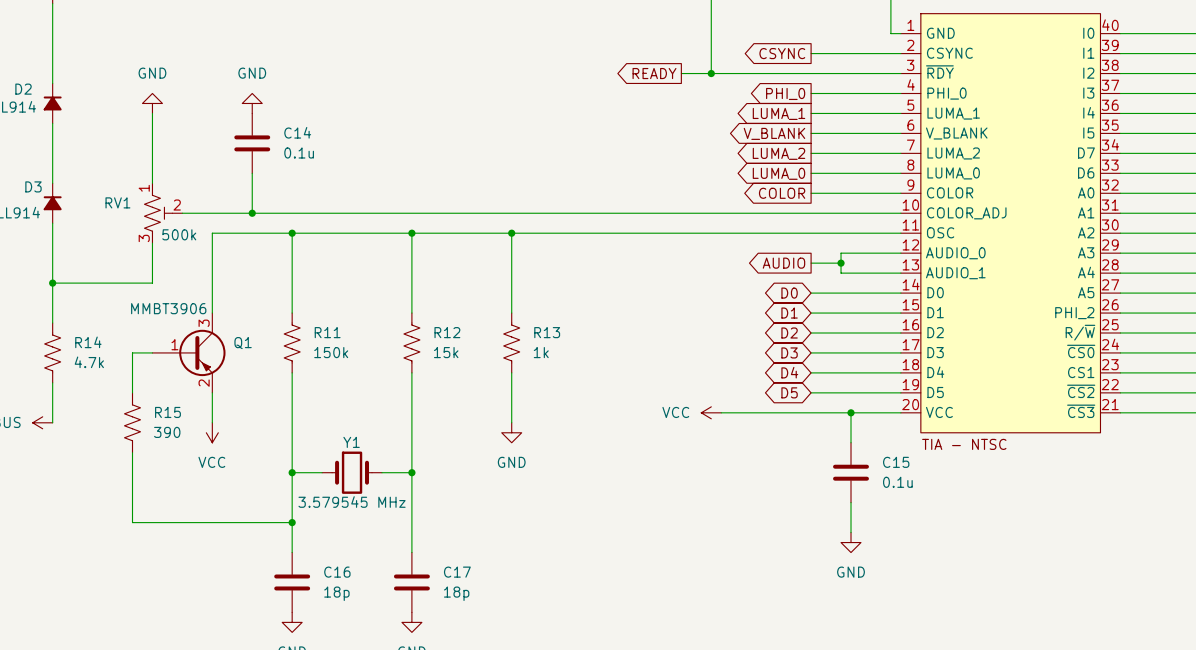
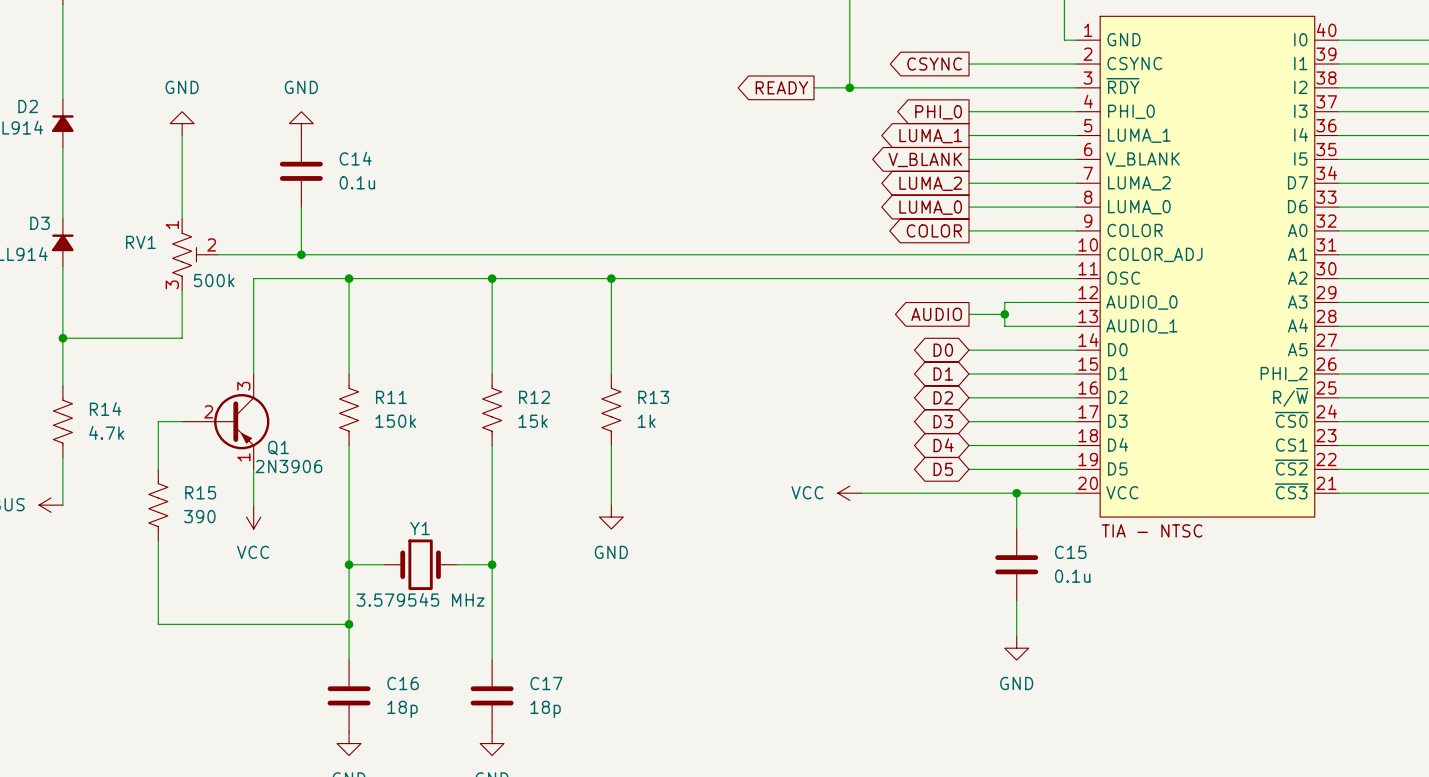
Q1 value: MMBT3906 (168, 308) -> 2N3906 (288, 466)
Q1 name position: Q1 (243, 343) -> Q1 (278, 448)
Q1 pin number: 1 (174, 344) -> 2 (208, 411)
Q1 pin number: 2 (204, 383) -> 1 (243, 457)

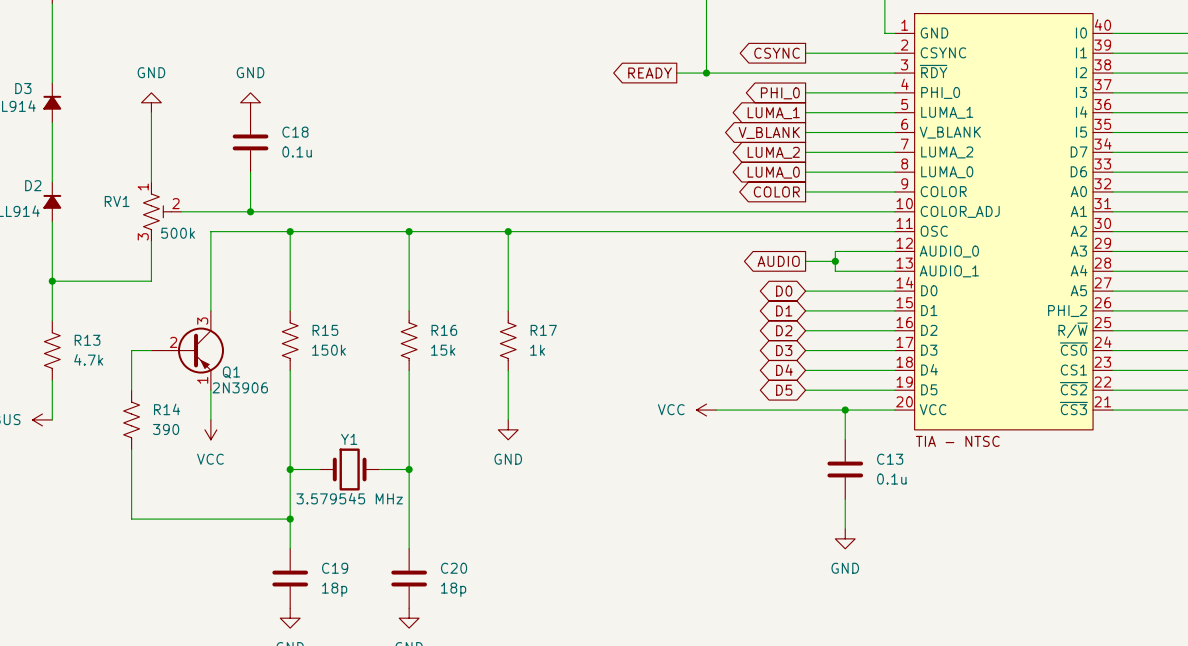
D2 name: D2 (28, 106) -> D3 (23, 88)
C14 name: C14 (355, 158) -> C18 (295, 132)
D3 name: D3 (40, 223) -> D2 (33, 185)
R11 name: R11 (391, 397) -> R15 (325, 330)
R12 name: R12 (534, 397) -> R16 (444, 330)
R13 name: R13 (653, 397) -> R17 (543, 330)
R14 name: R14 (105, 409) -> R13 (87, 340)
R15 name: R15 (200, 492) -> R14 (167, 409)
C15 name: C15 (1070, 552) -> C13 (890, 459)
C16 name: C16 (403, 683) -> C19 (335, 568)
C17 name: C17 (546, 683) -> C20 (454, 568)

